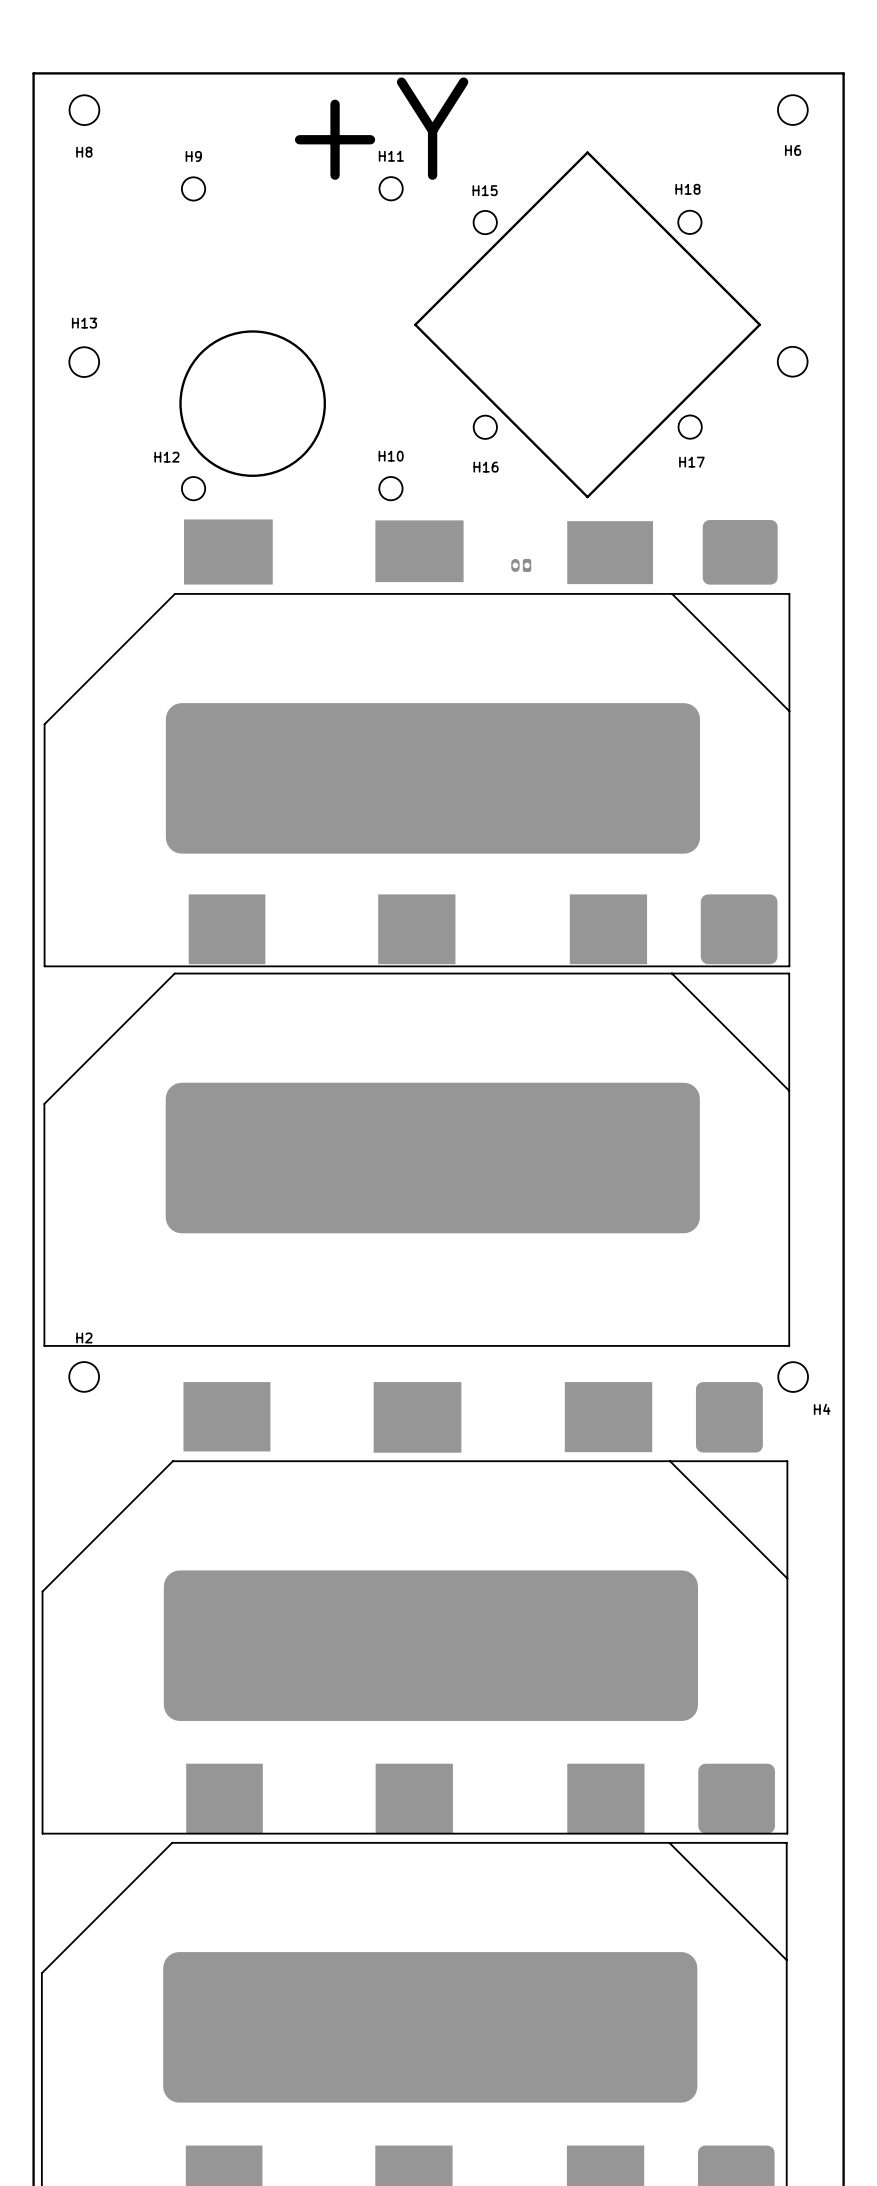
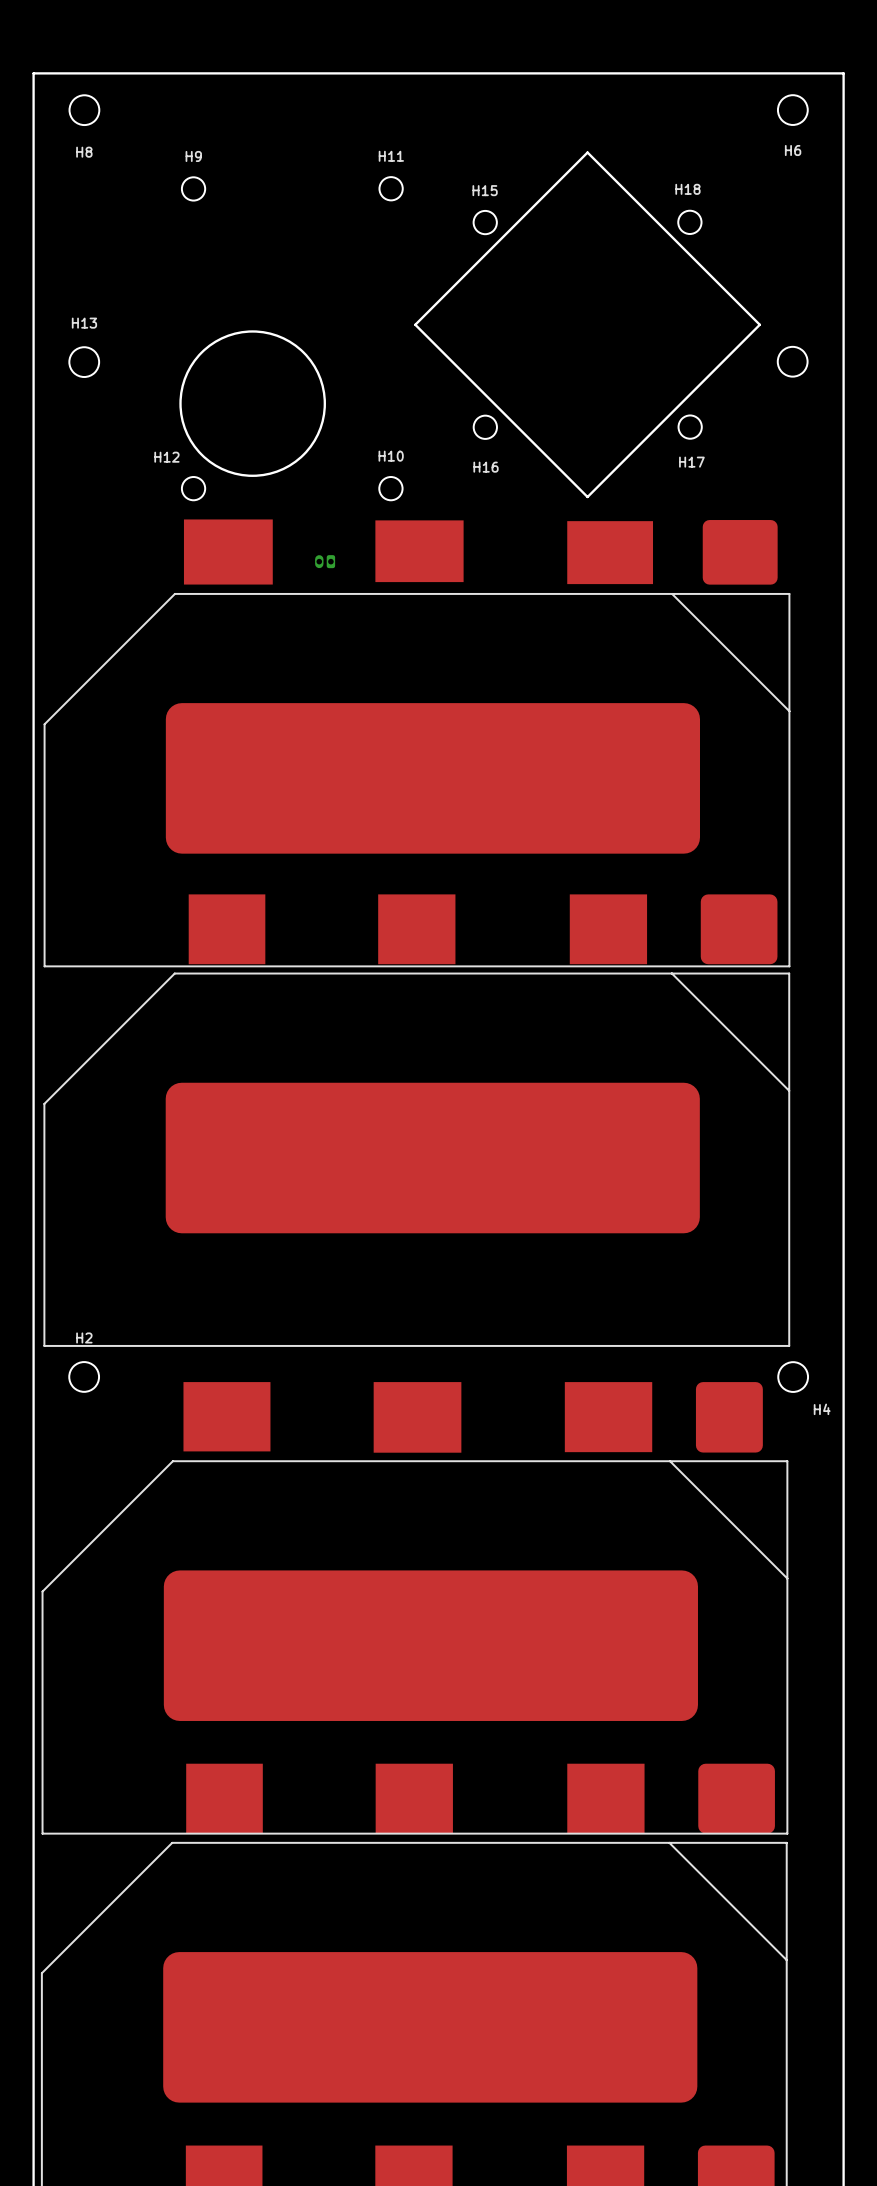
text: +Y (381, 128) -> none
part position: (521, 565) -> (325, 561)

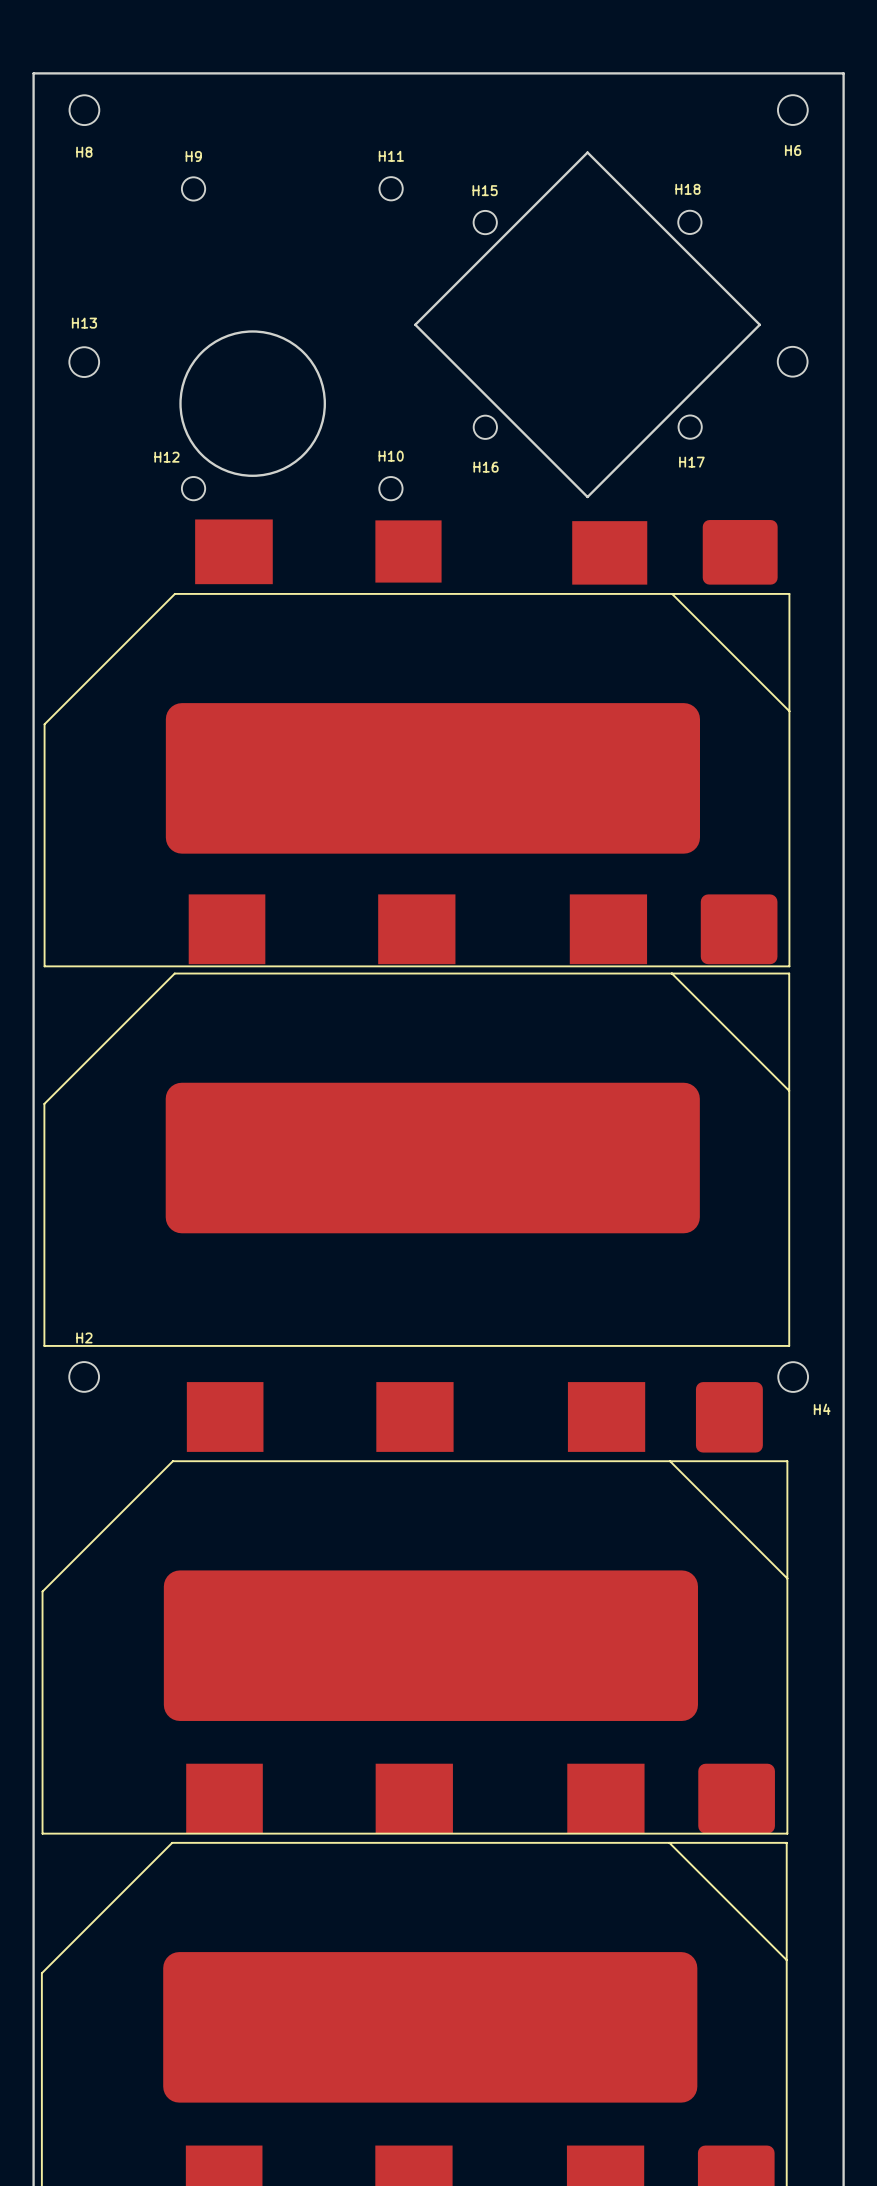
part footprint: [44, 519, 790, 967] -> [44, 519, 790, 967]
part: (325, 561) -> none
part footprint: [42, 1382, 788, 1835] -> [42, 1382, 788, 1835]

